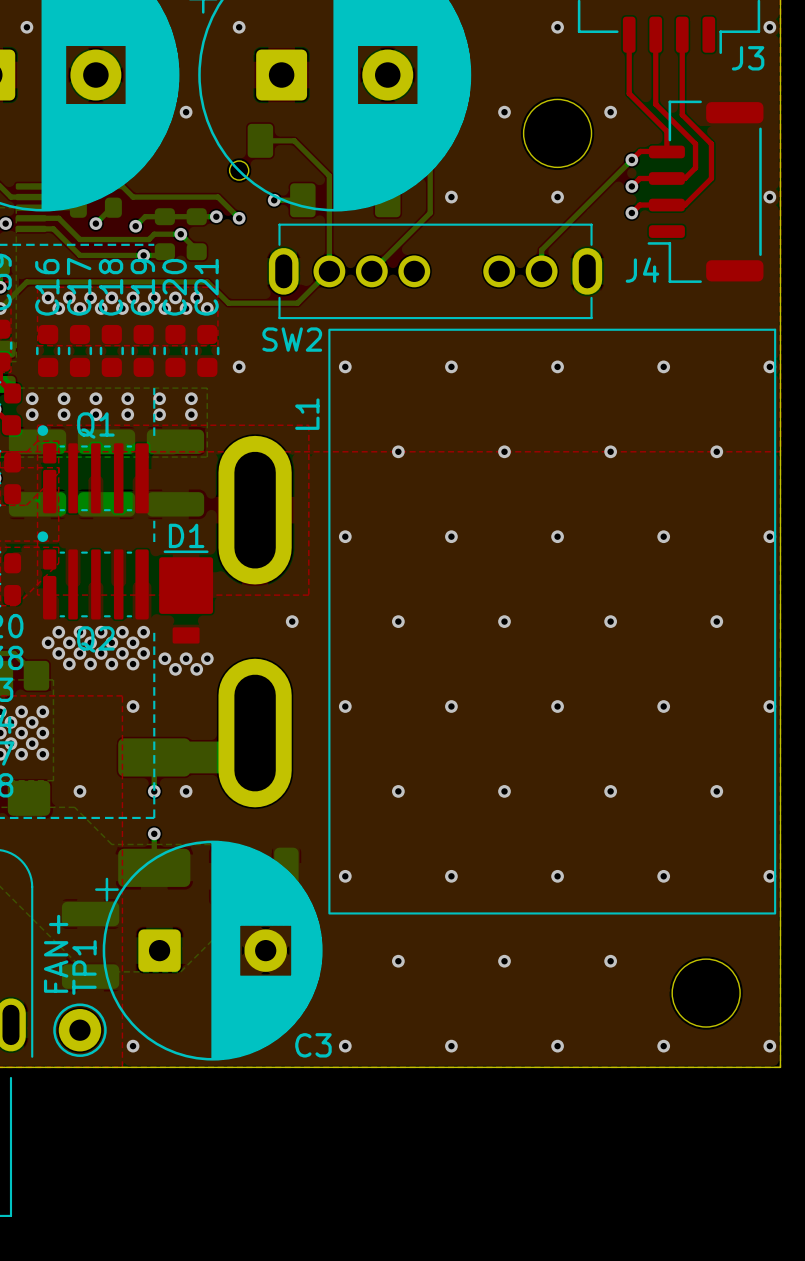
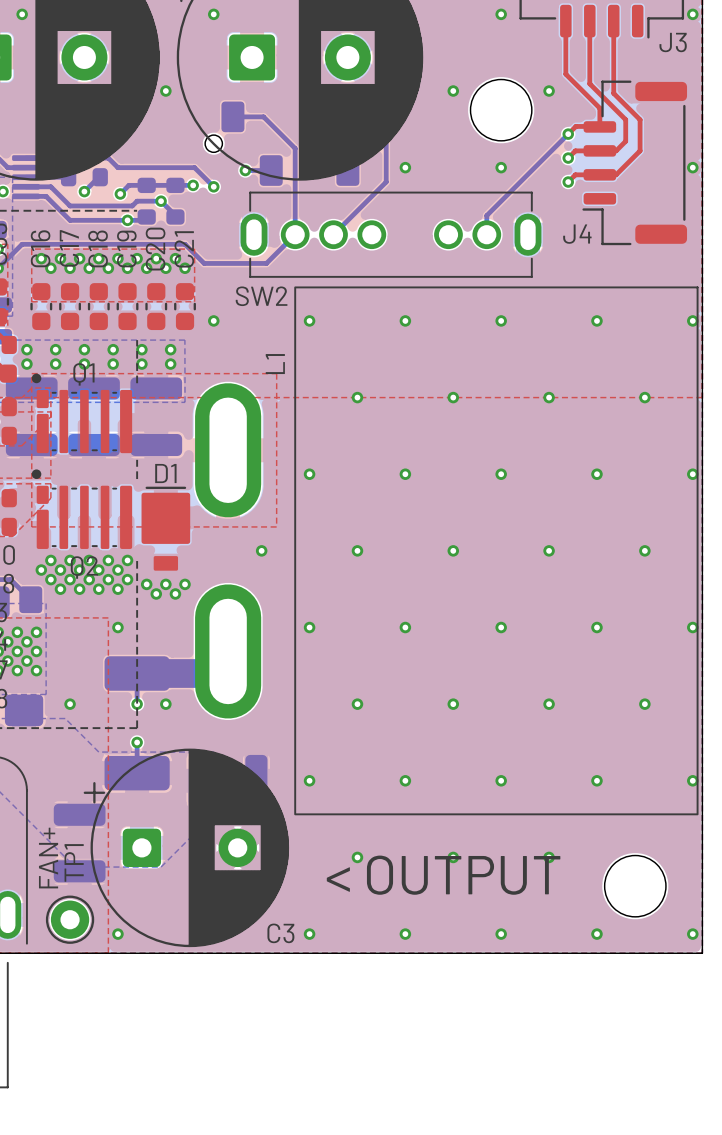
text: none -> < OUTPUT (443, 875)

